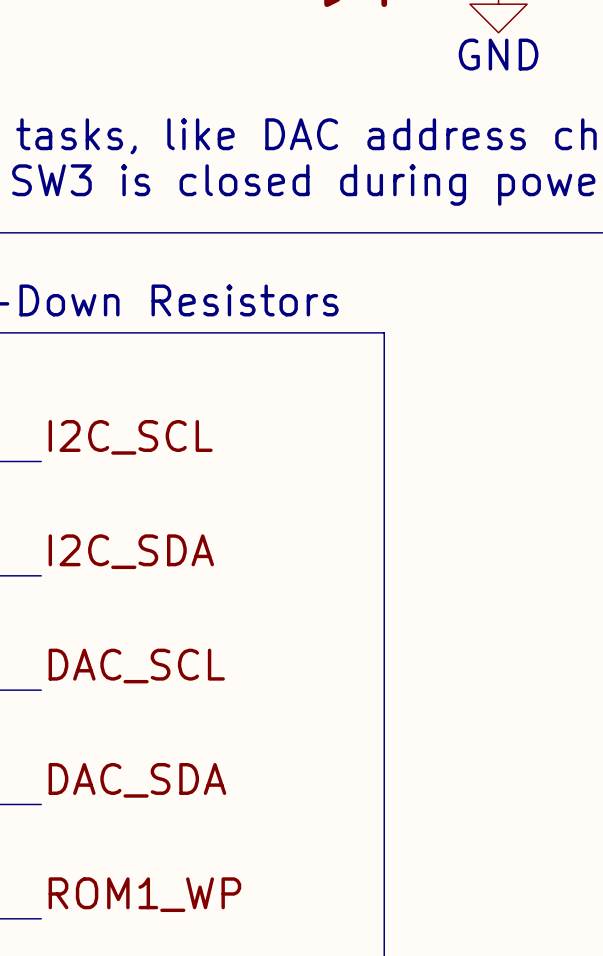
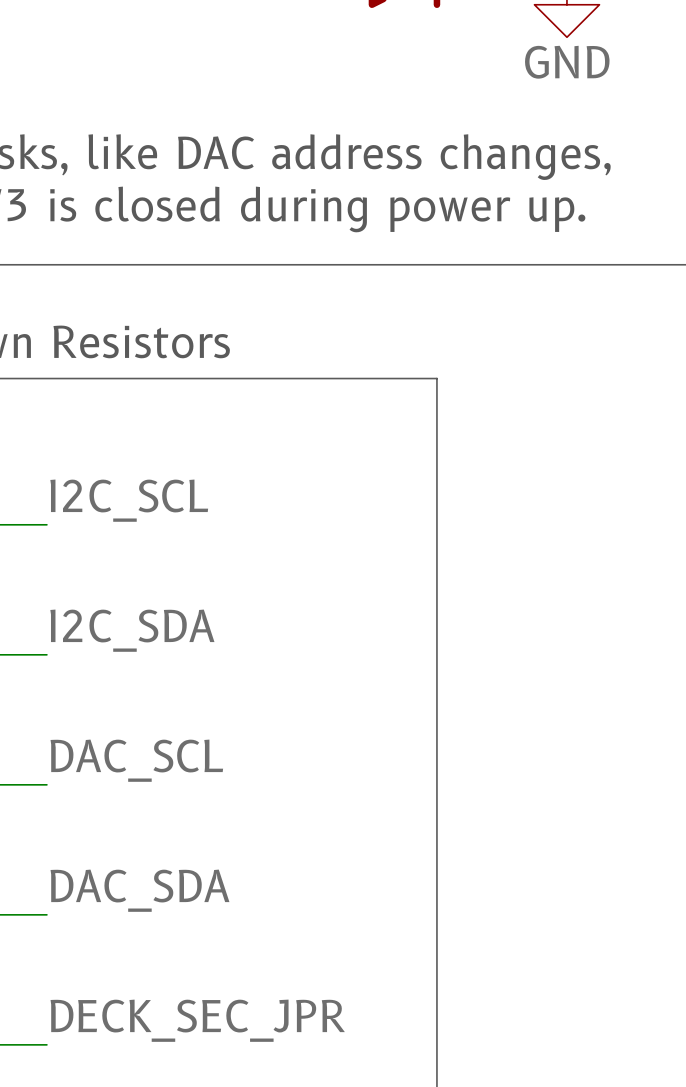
label: ROM1_WP (144, 894) -> DECK_SEC_JPR (197, 1020)

